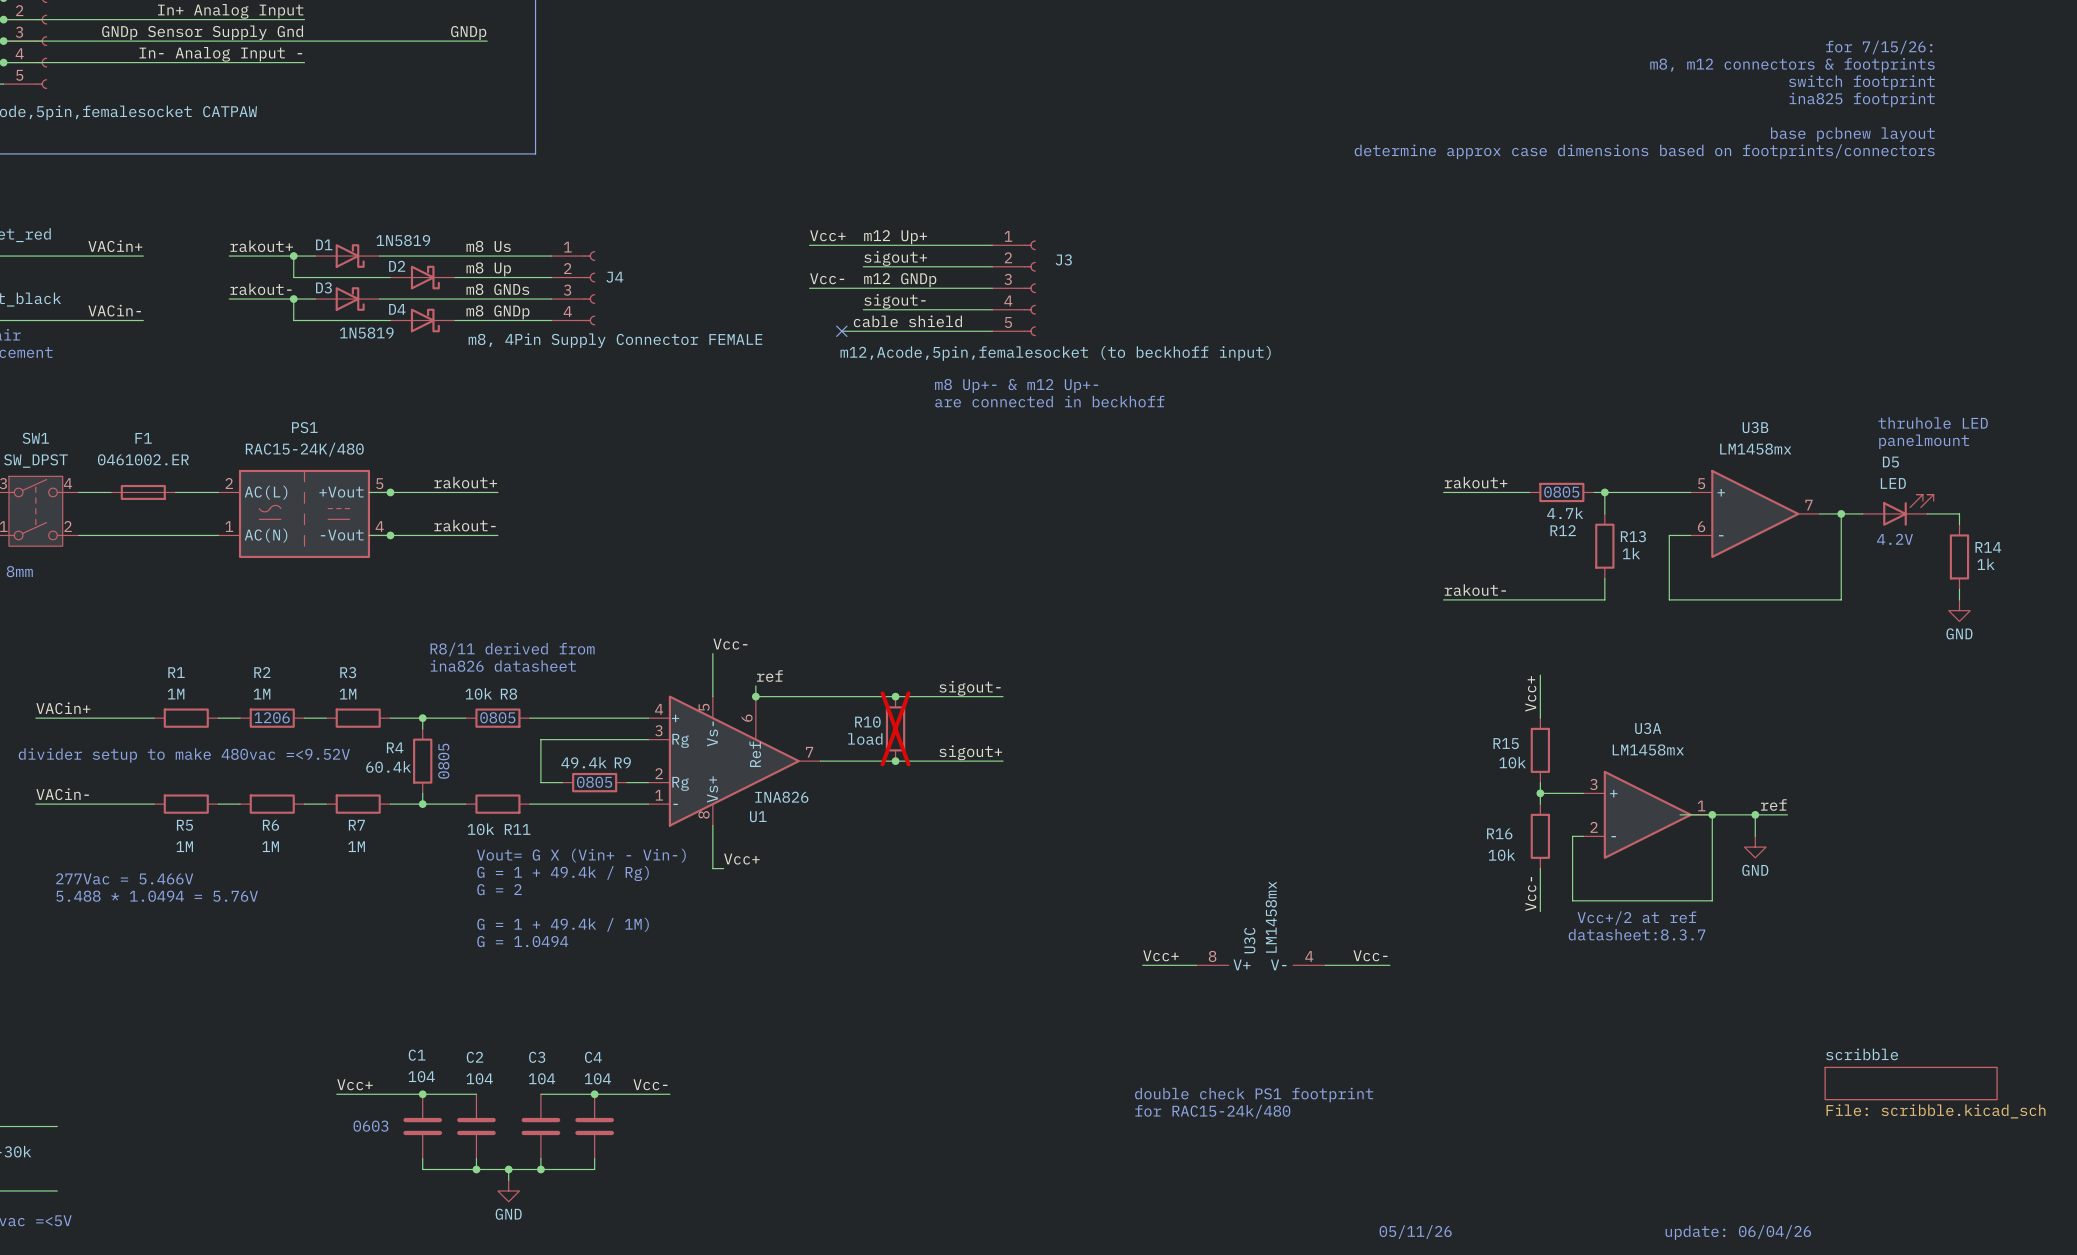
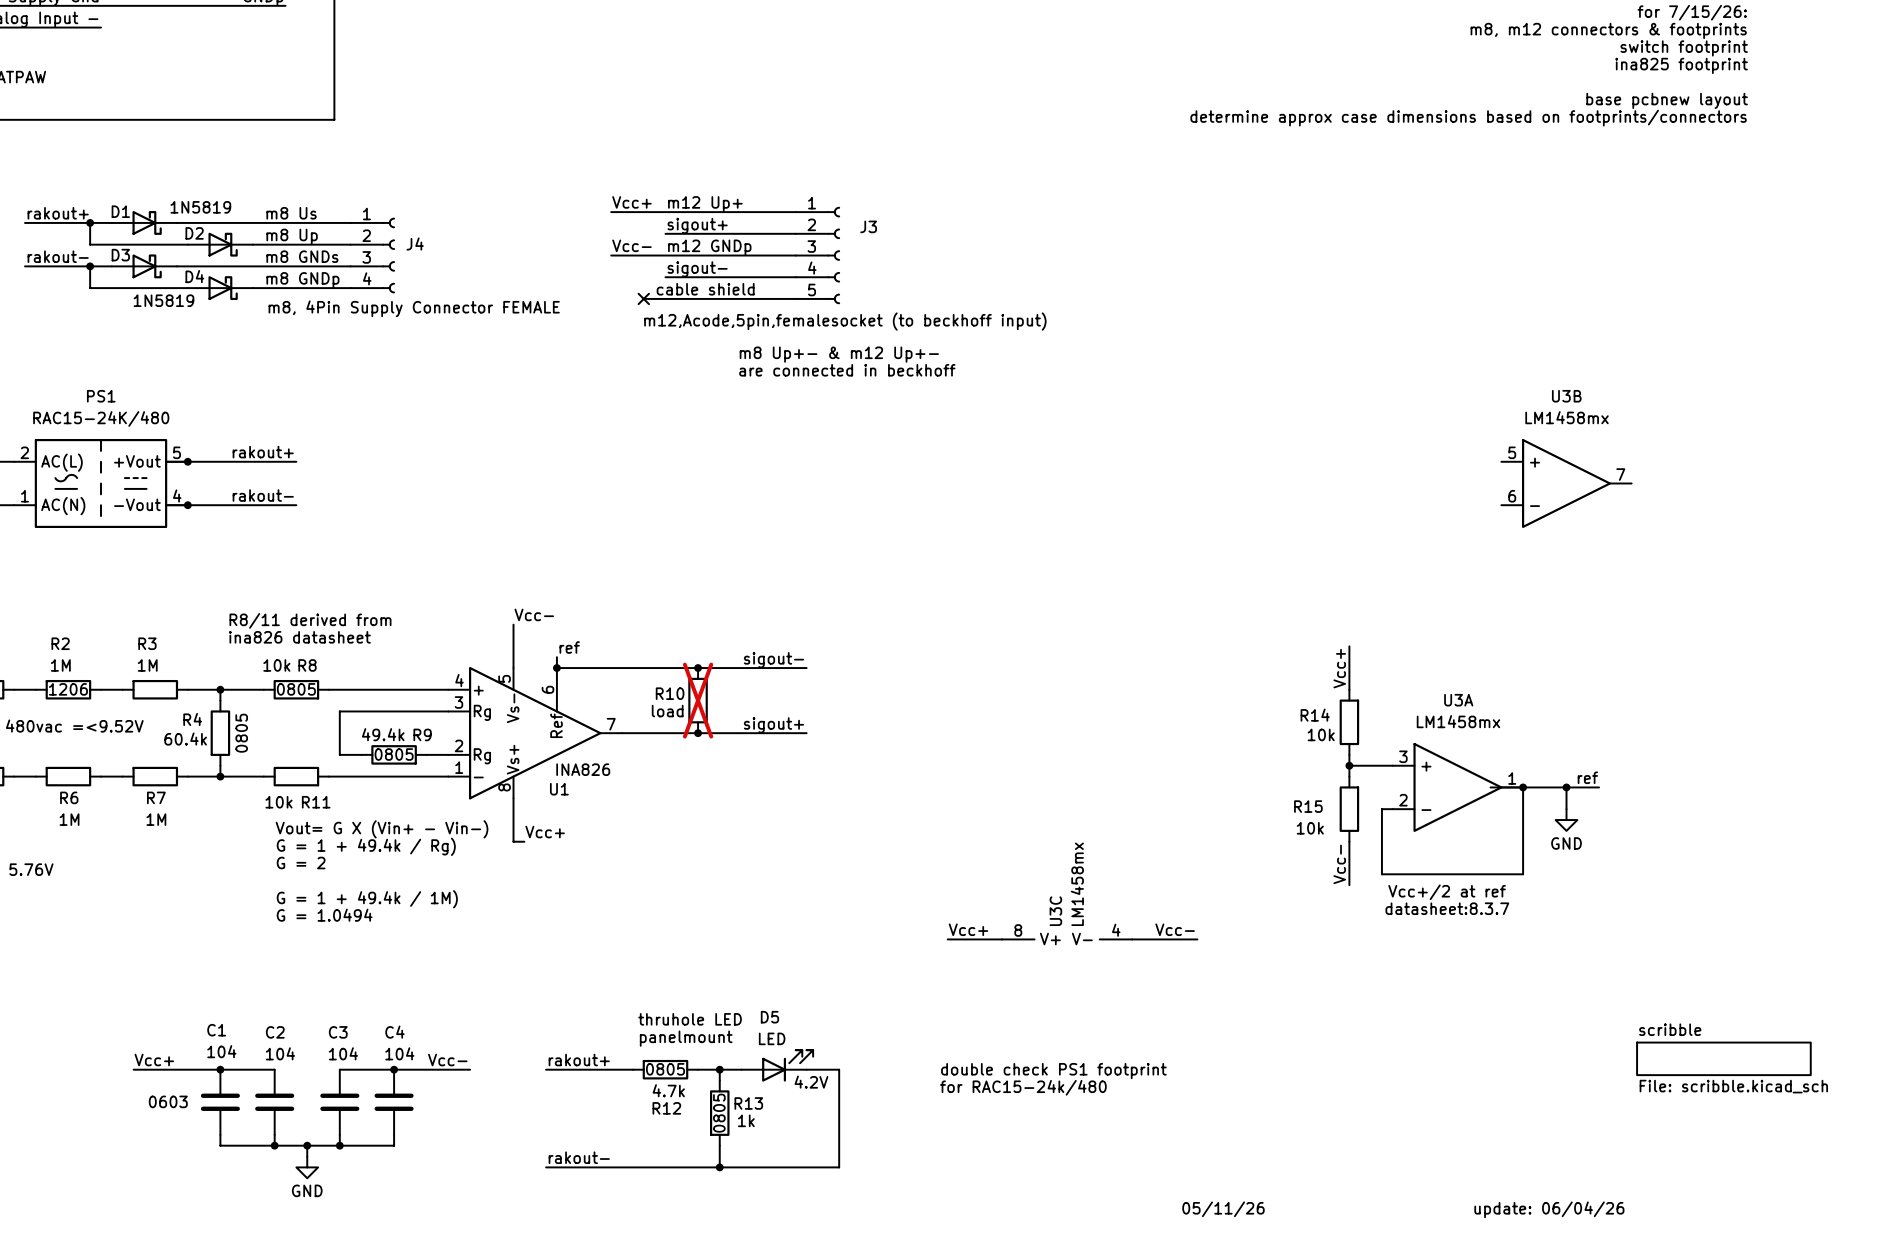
text: thruhole LED (1933, 423) -> none
text: panelmount (1924, 441) -> none
label: rakout+ (1476, 482) -> none
wire: (1443, 492) (1529, 492) -> none
text: 0805 (1561, 492) -> none
R12 position: (1561, 492) -> (665, 1069)
wire: (1594, 492) (1690, 492) -> none
wire: (1604, 492) (1604, 513) -> none
junction: (1604, 492) -> none
D5 position: (1898, 510) -> (777, 1065)
wire: (1819, 513) (1862, 513) -> none
wire: (1841, 513) (1841, 599) (1669, 599) (1669, 535) (1690, 535) -> none
junction: (1841, 513) -> none
wire: (1927, 513) (1959, 513) (1959, 524) -> none
text: 4.2V (1894, 539) -> none
R13 position: (1604, 546) -> (719, 1113)
R14: 1k (1959, 556) -> none
wire: (1604, 578) (1604, 599) (1443, 599) -> none
wire: (1959, 589) (1959, 599) -> none
label: rakout- (1475, 590) -> none
power symbol: GND (1959, 610) -> none
R15 name: R15 (1506, 743) -> R14 (1315, 715)
R16 name: R16 (1499, 833) -> R15 (1308, 806)
text: none -> thruhole LED (690, 1019)
text: none -> panelmount (686, 1038)
label: none -> rakout+ (579, 1060)
text: none -> 0805 (665, 1069)
wire: none -> (546, 1069) (632, 1069)
wire: none -> (698, 1069) (741, 1069)
wire: none -> (719, 1069) (719, 1080)
junction: none -> (719, 1069)
wire: none -> (806, 1069) (839, 1069) (839, 1167) (546, 1167)
text: none -> 4.2V (811, 1082)
text: none -> 0805 (719, 1113)
wire: none -> (719, 1145) (719, 1167)
label: none -> rakout- (579, 1157)
junction: none -> (719, 1167)

